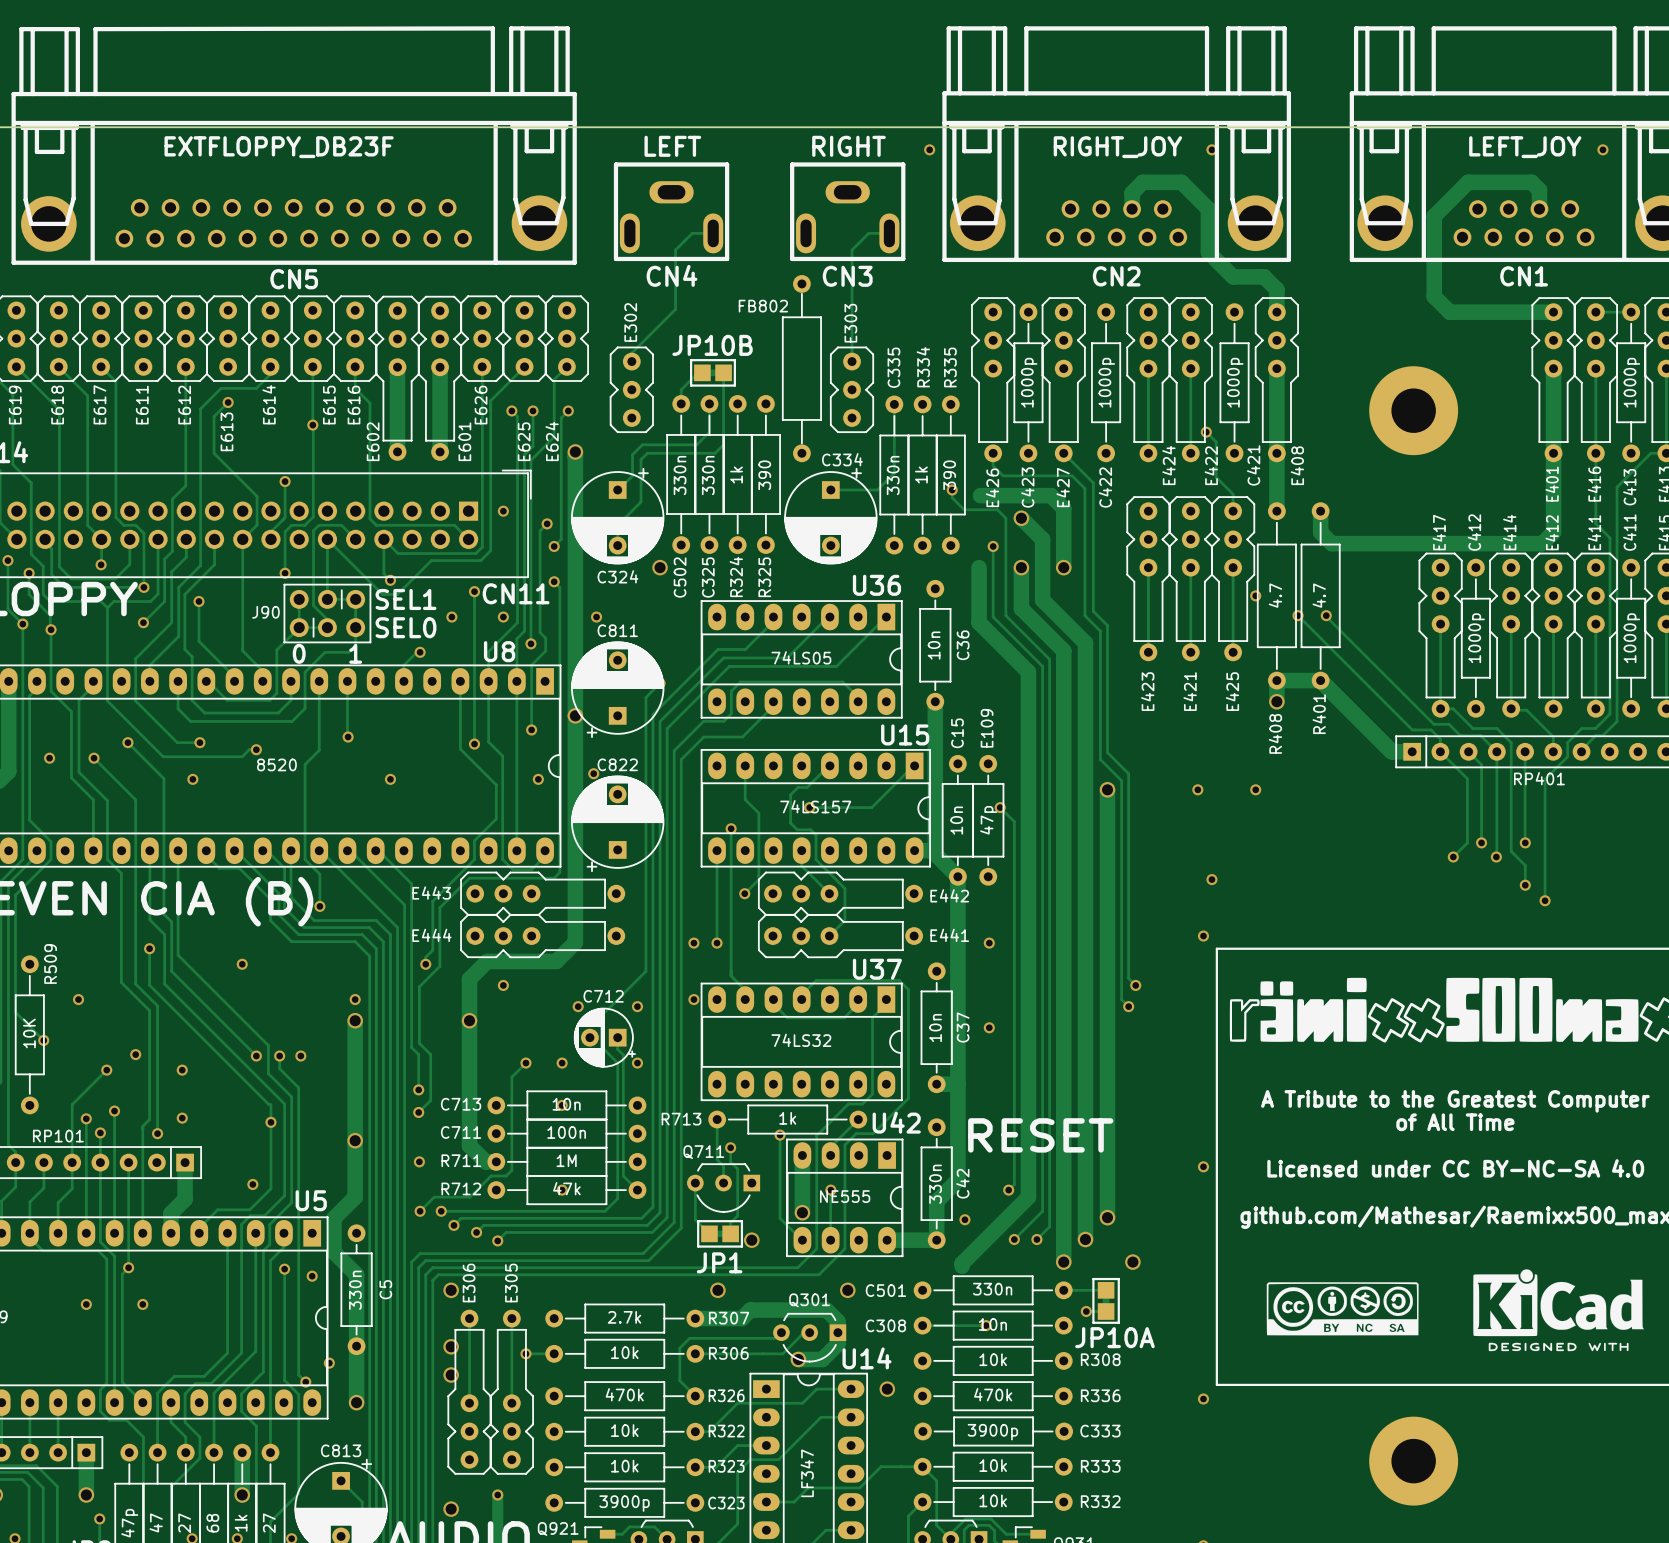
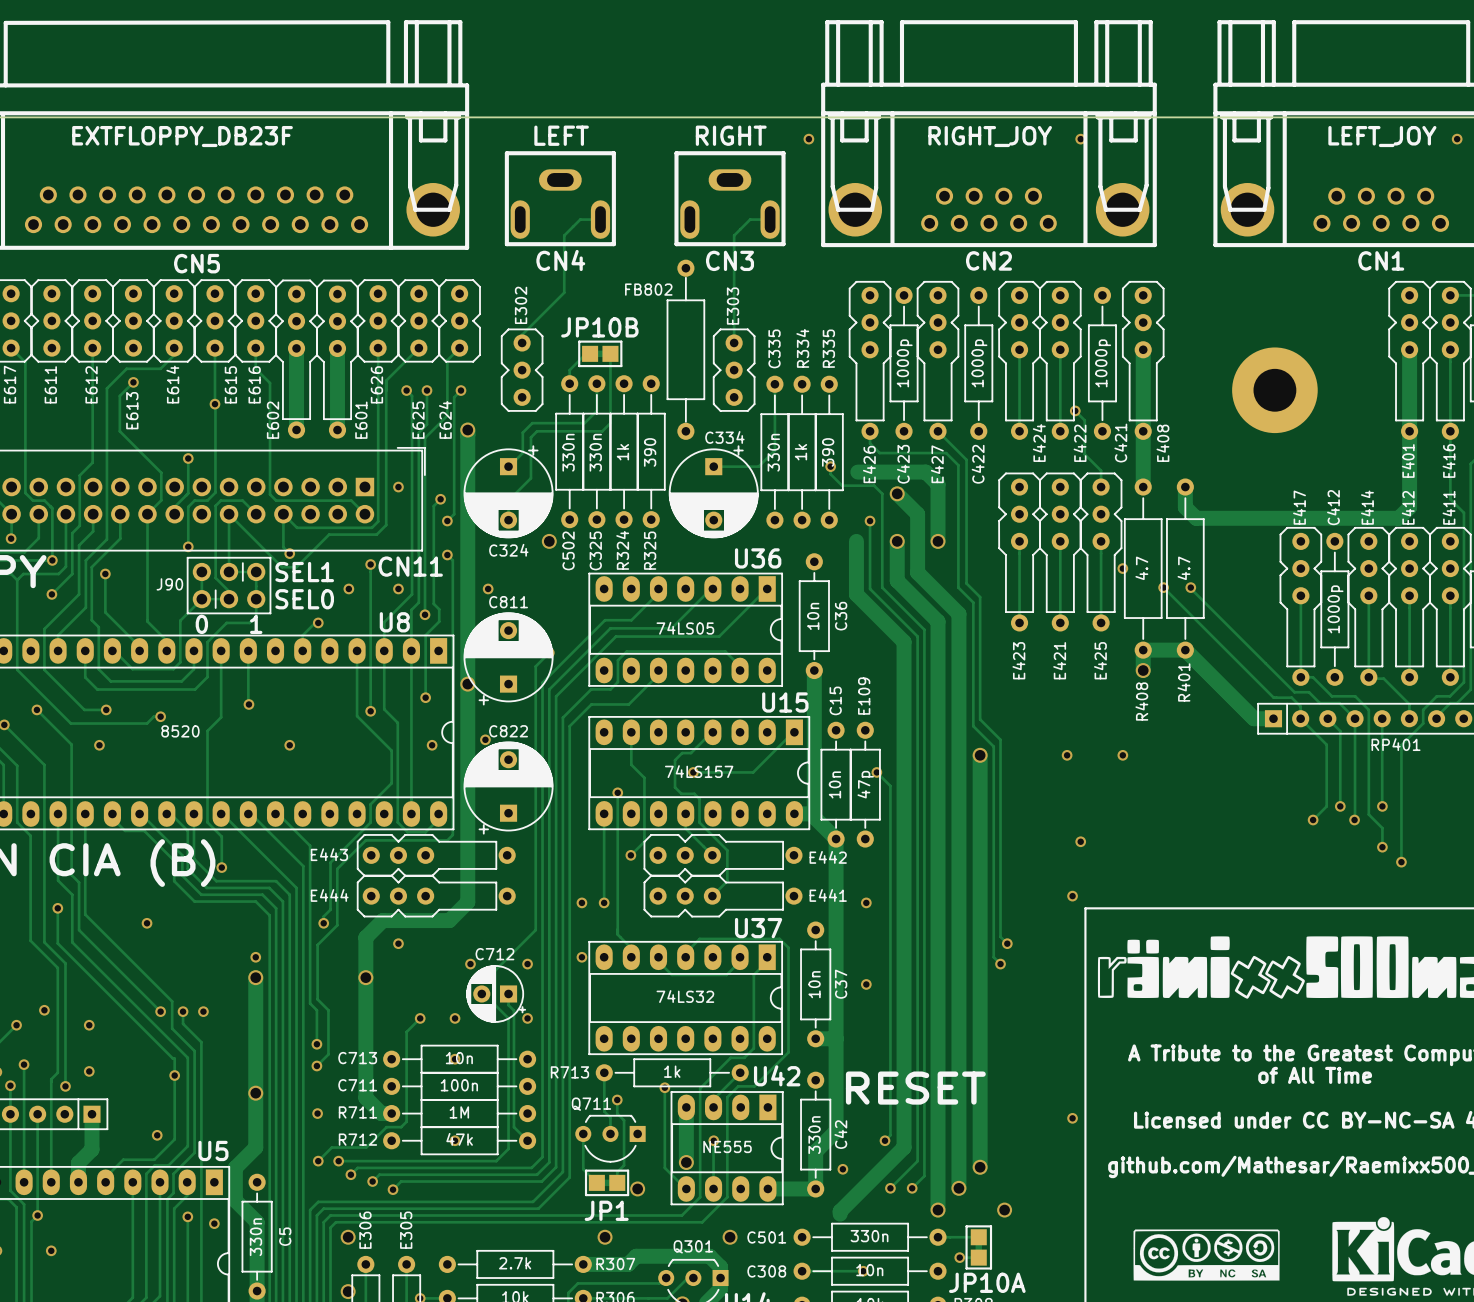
track: (1132, 209) (1132, 193) (1142, 182) (1181, 182) (1208, 209) (1208, 252) (1233, 276) (1264, 276) (1276, 289) (1276, 312) -> none
track: (1539, 209) (1539, 190) (1531, 182) (1468, 182) (1434, 216) (1434, 296) (1449, 312) (1552, 312) -> none

